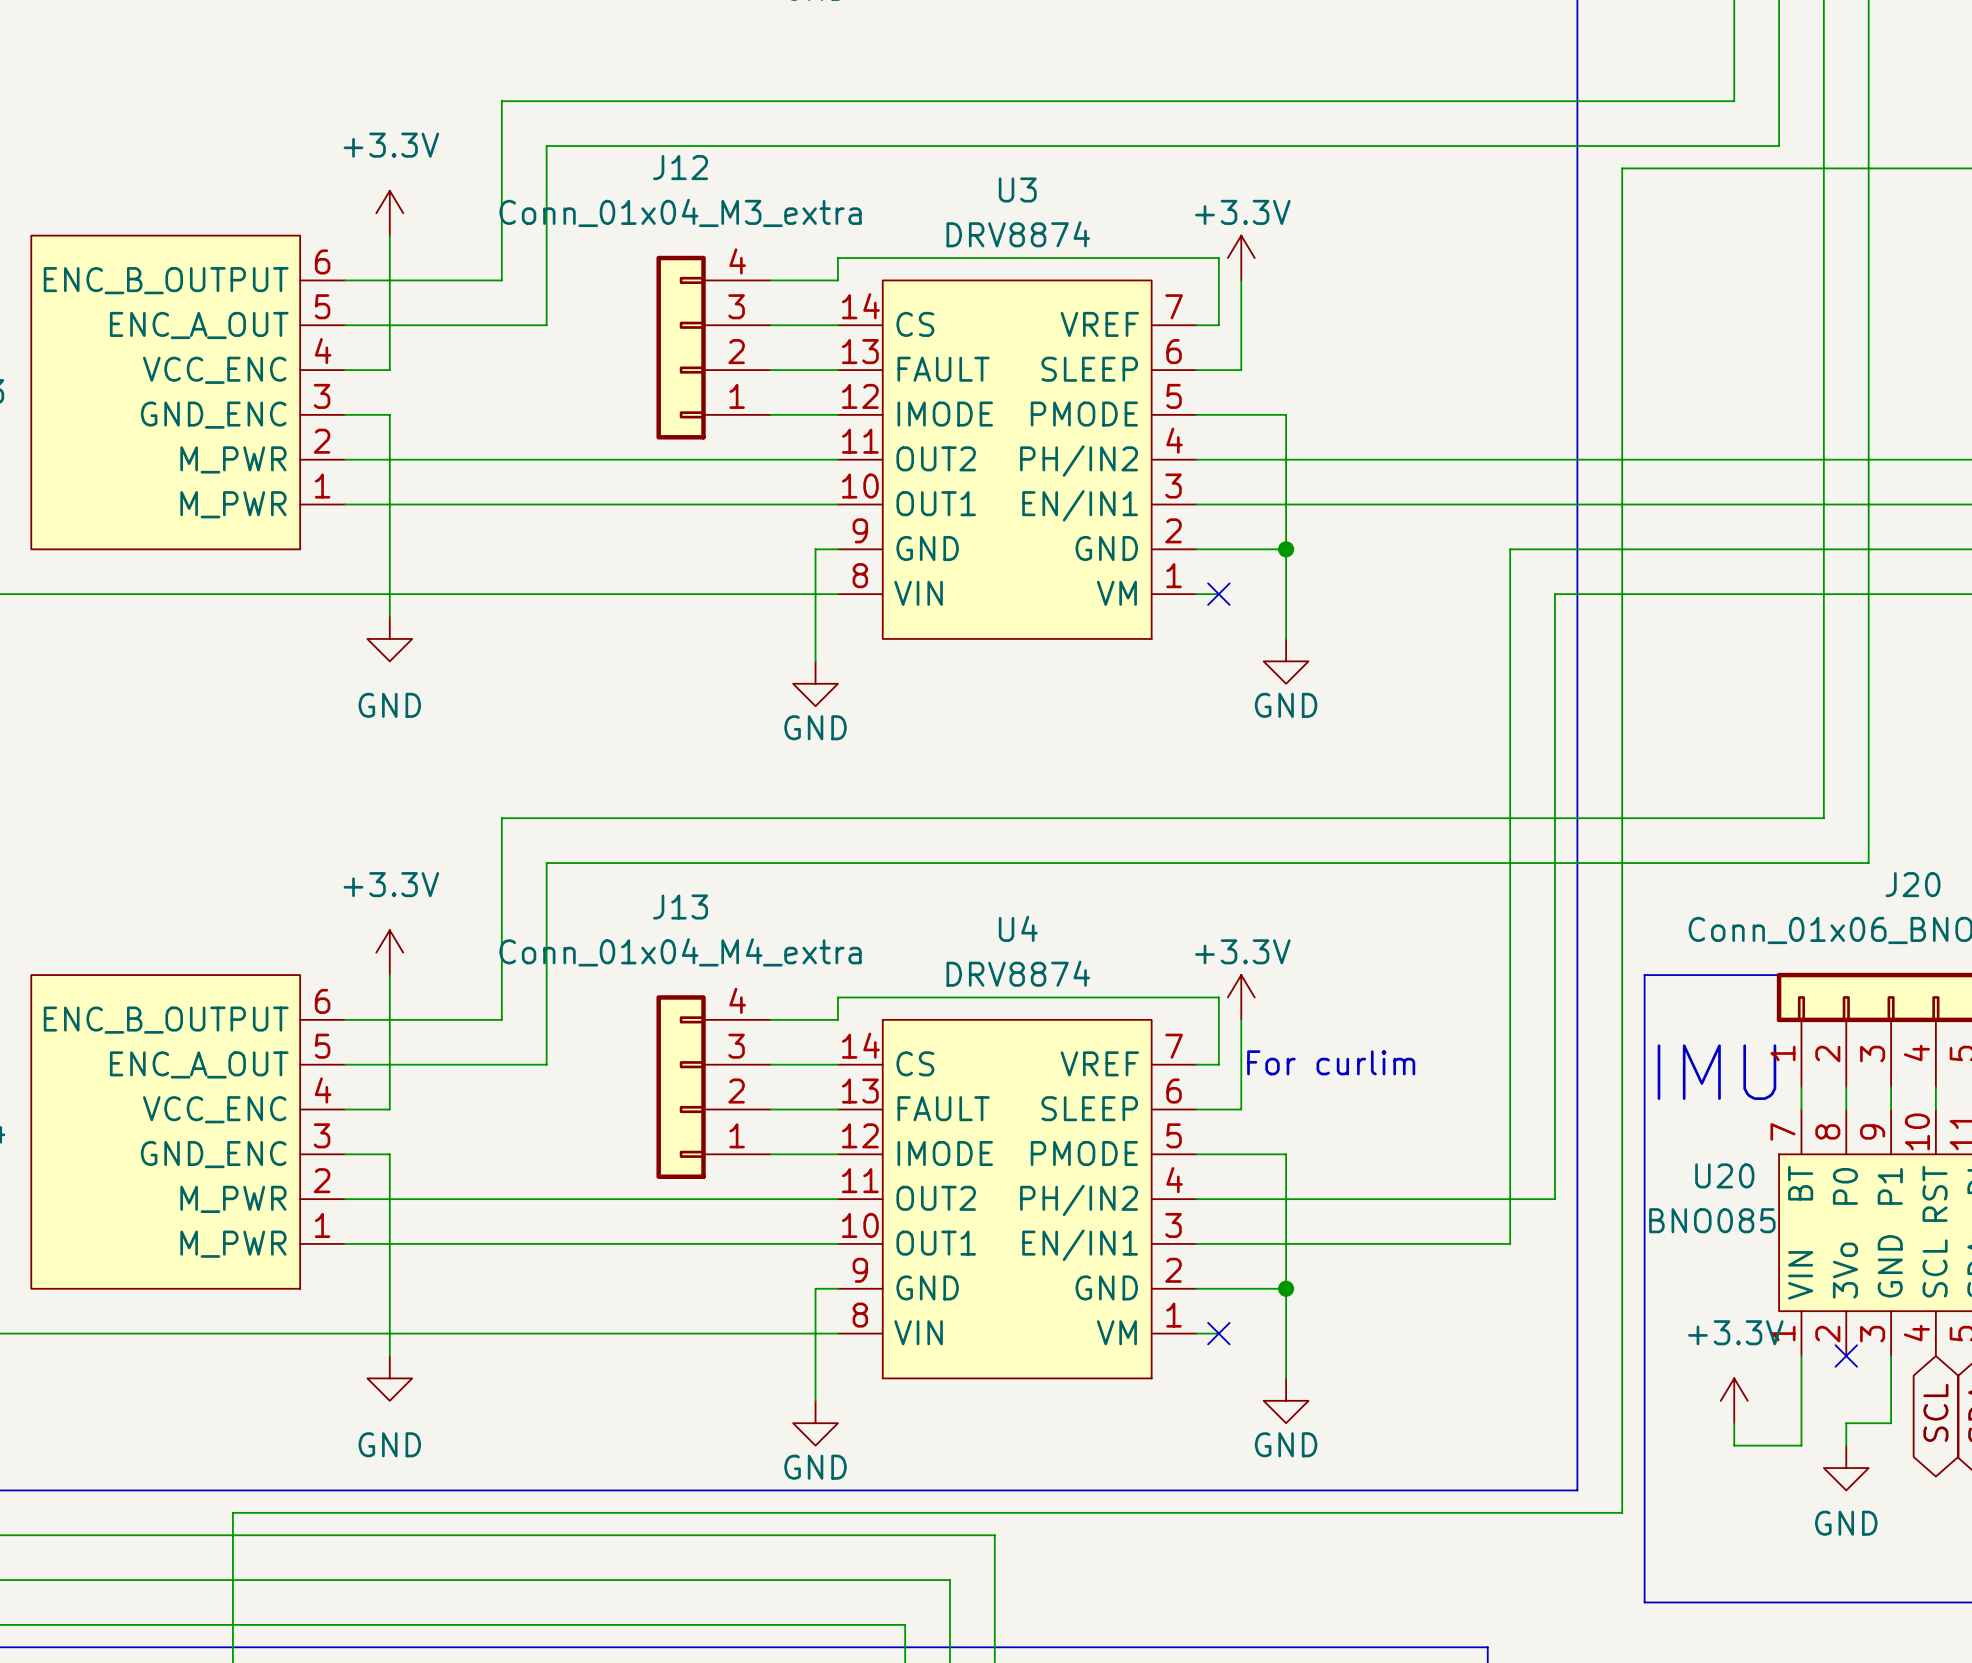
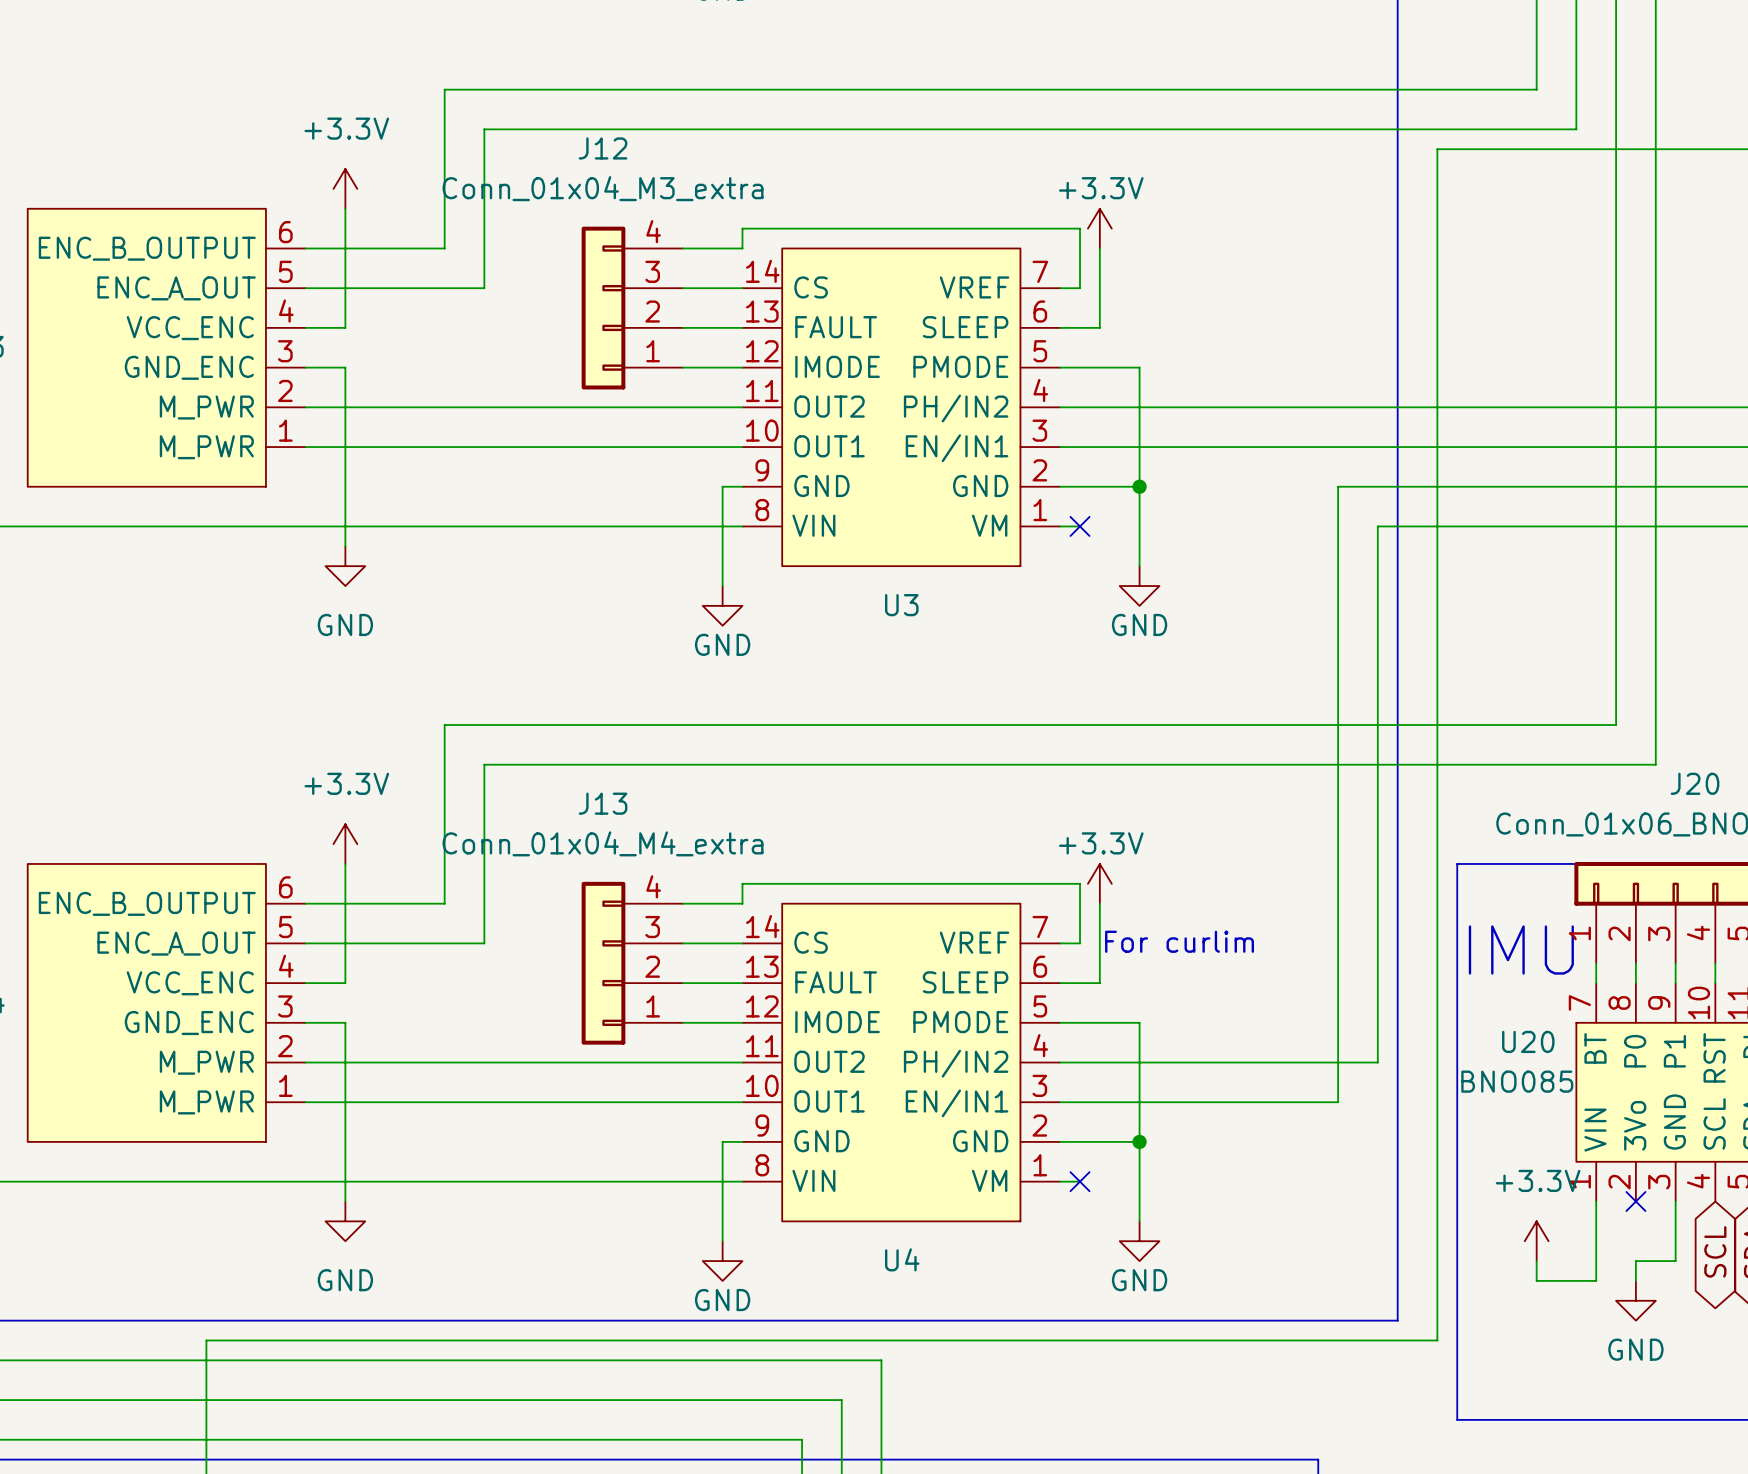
U3 name position: U3 (1017, 189) -> U3 (901, 605)
U3 value: DRV8874 (1018, 234) -> none
U4 name position: U4 (1018, 928) -> U4 (902, 1259)
U4 value: DRV8874 (1018, 973) -> none

